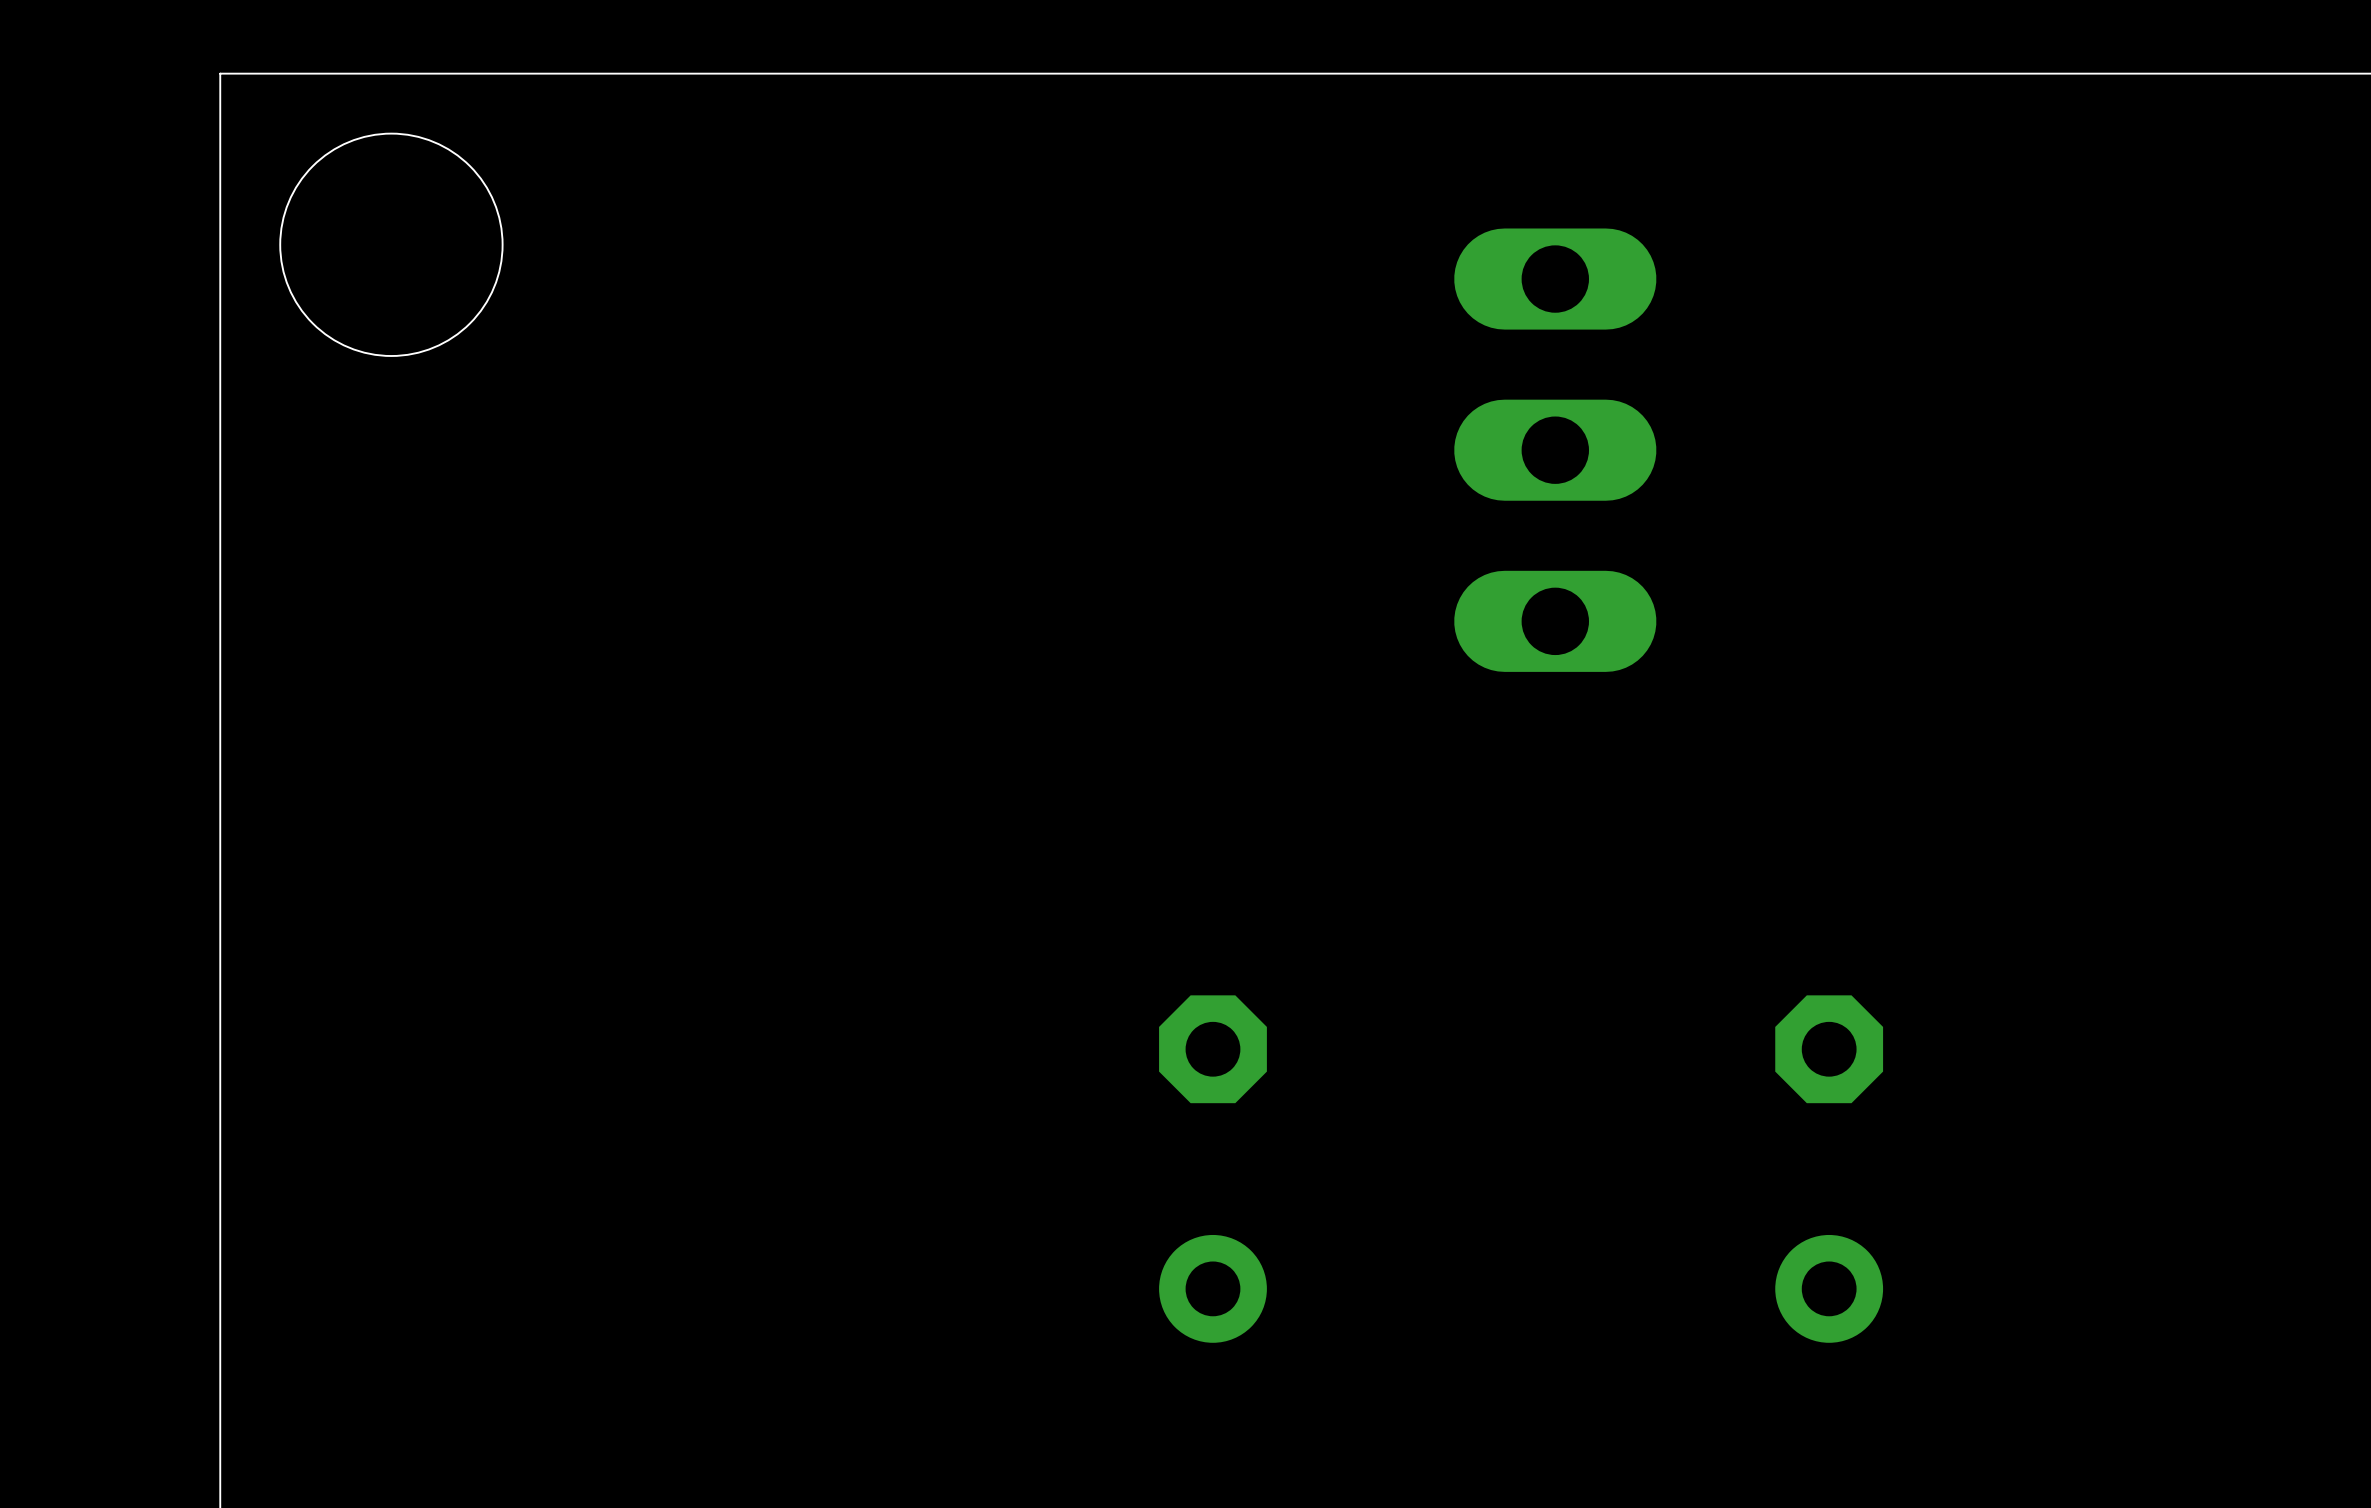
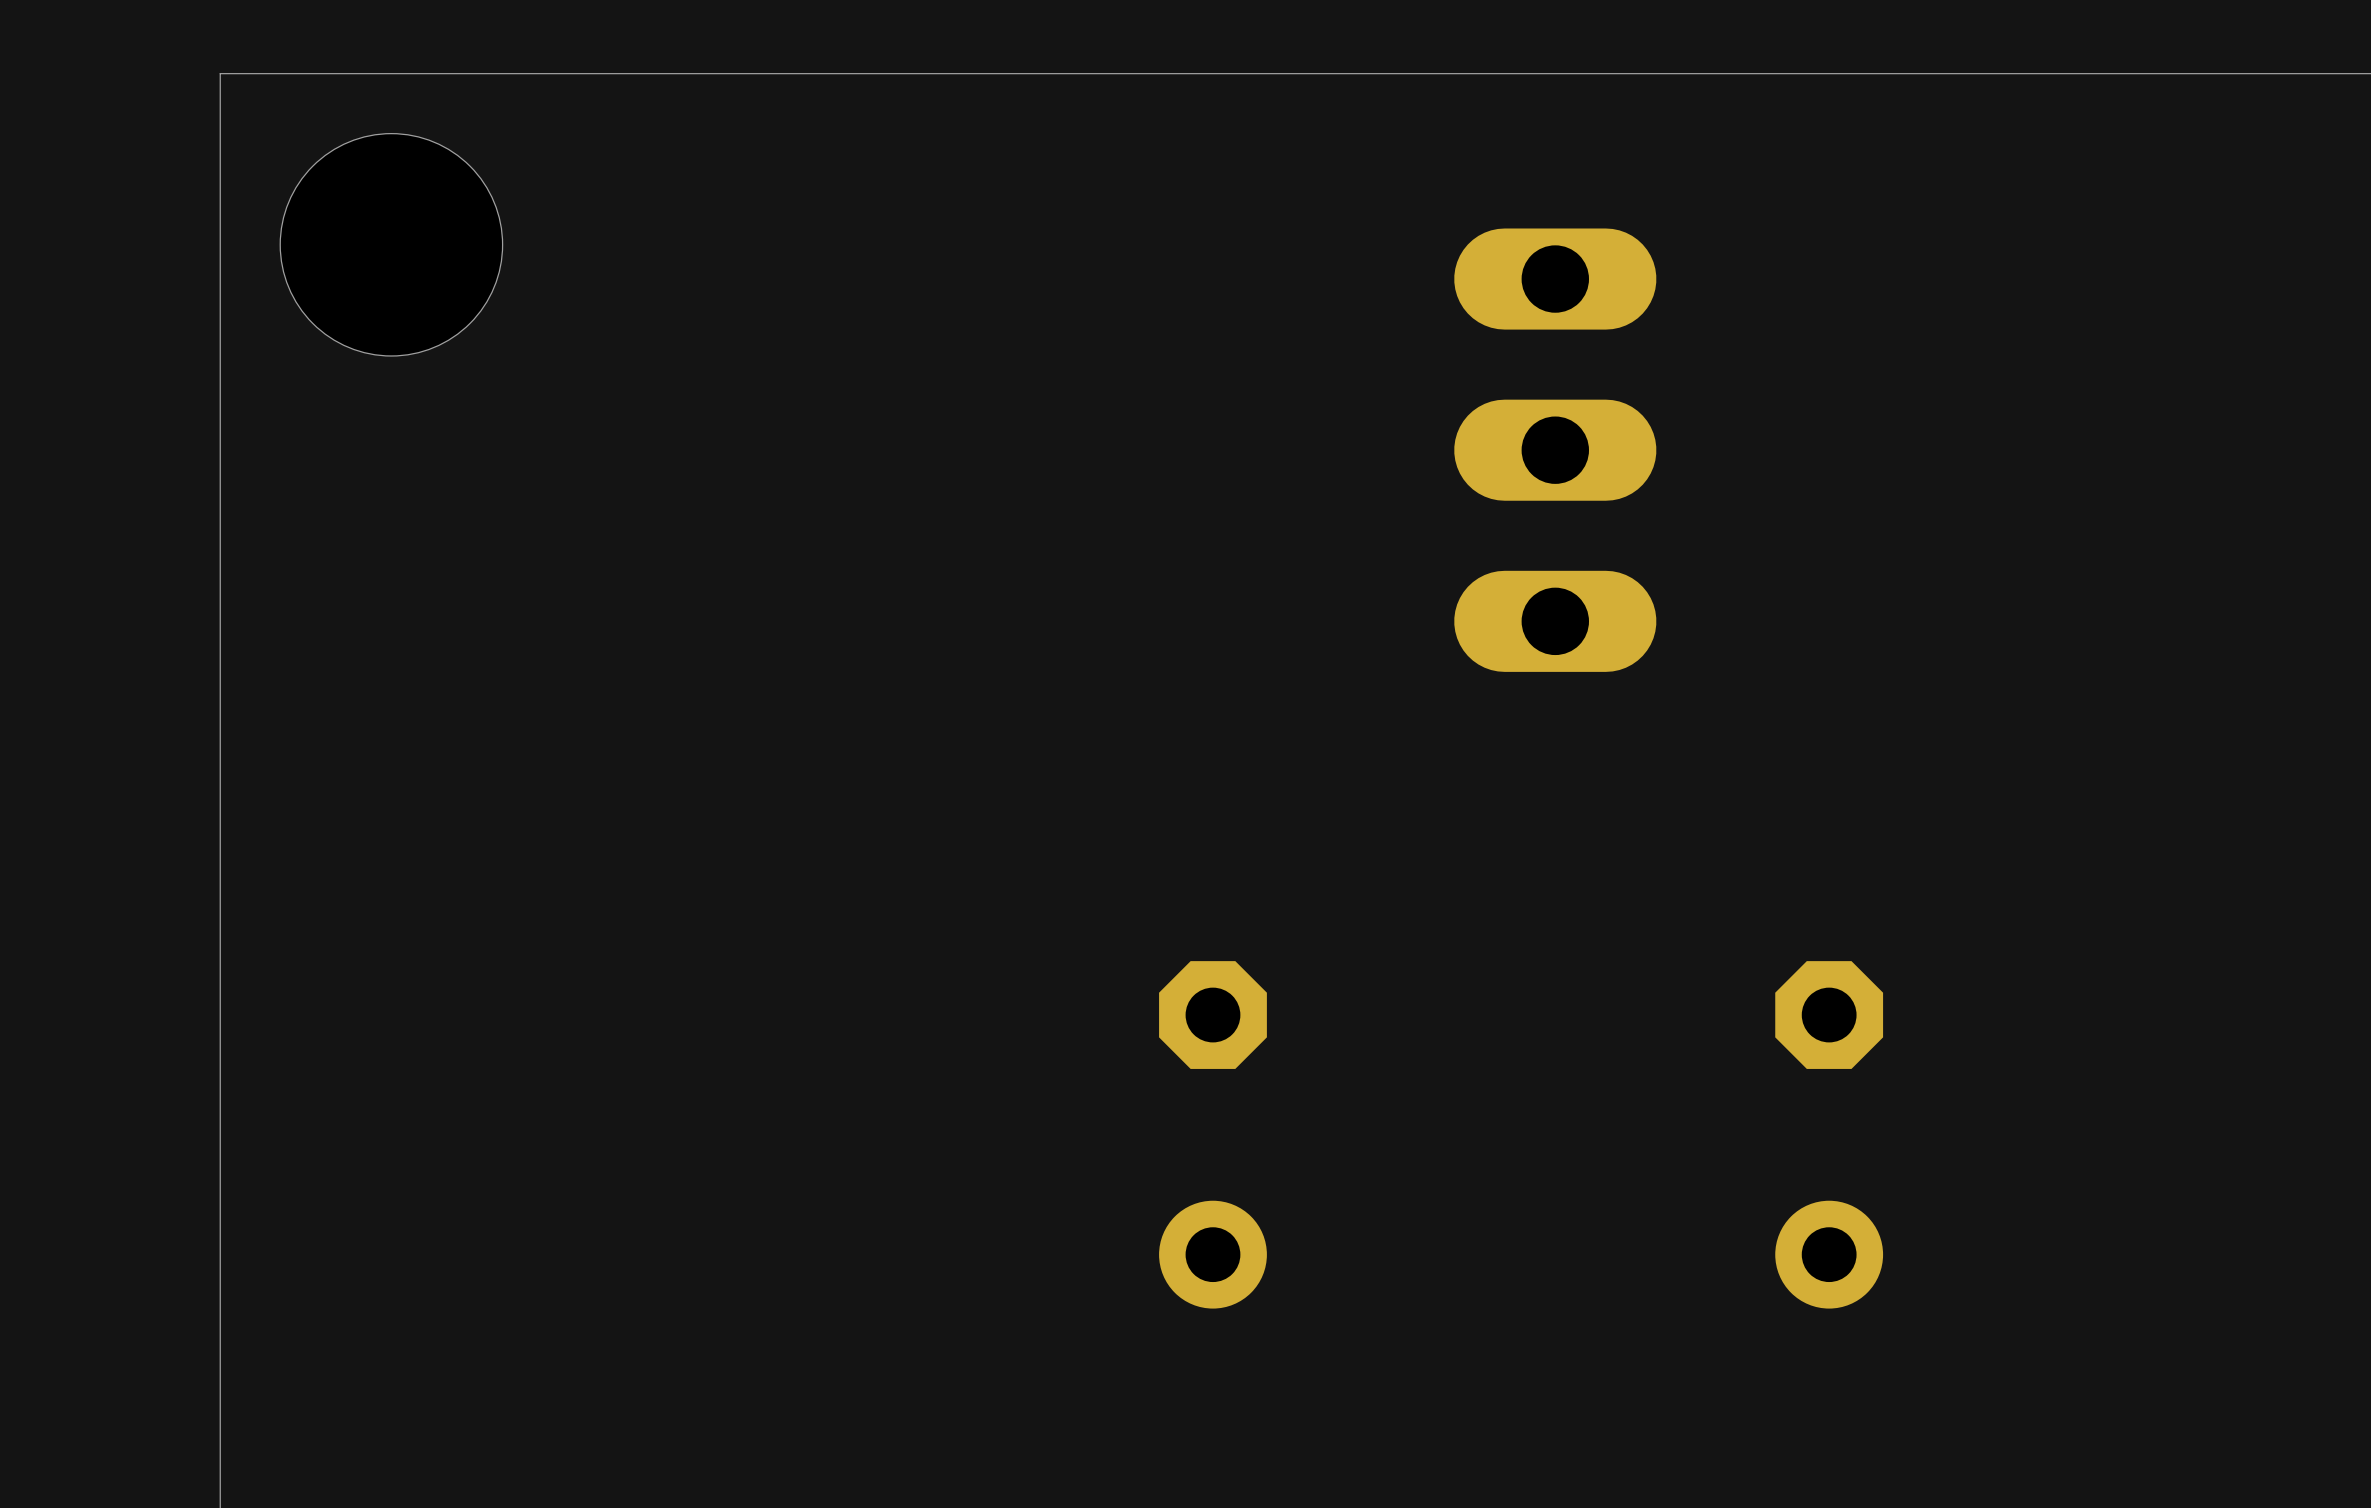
part position: (1212, 1169) -> (1212, 1134)
part position: (1829, 1169) -> (1829, 1134)

